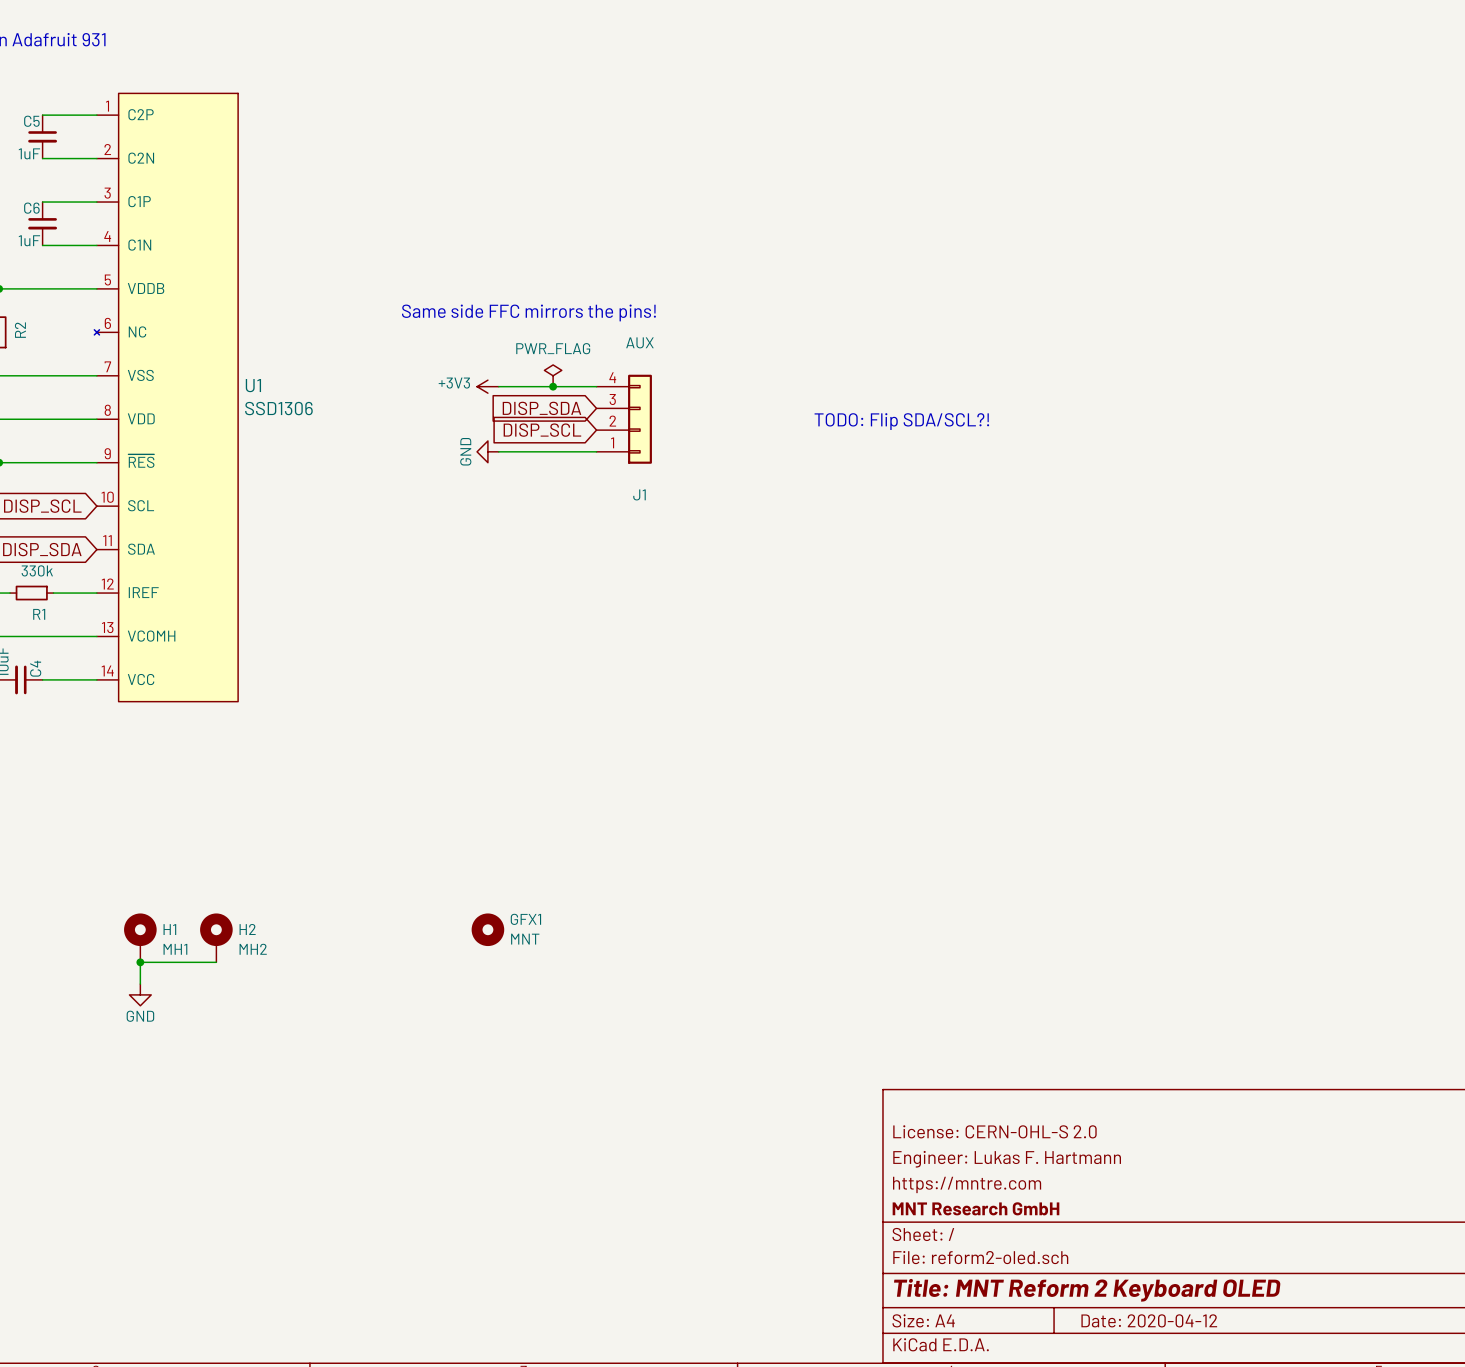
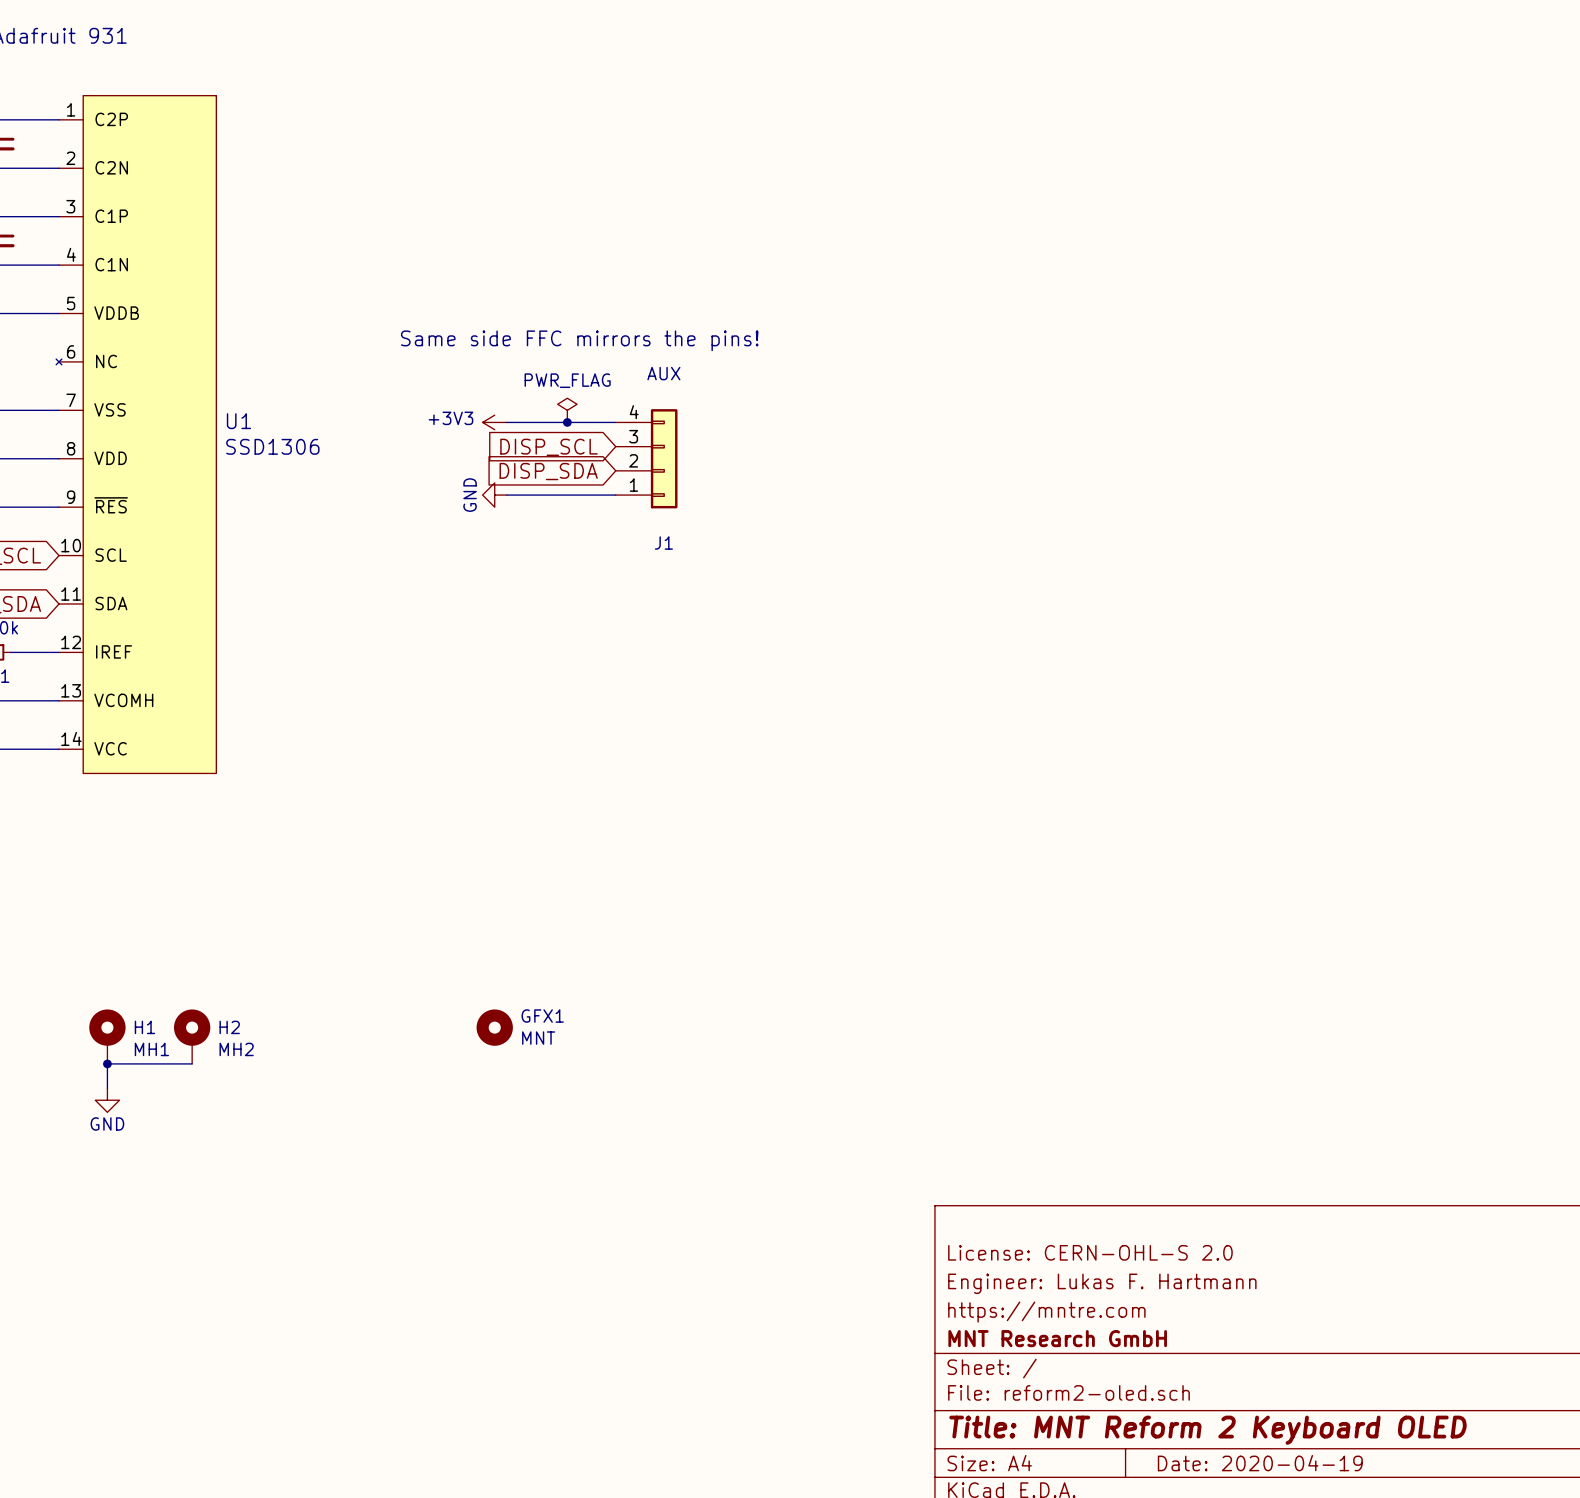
global label: DISP_SDA (541, 408) -> DISP_SCL (549, 447)
text: TODO: Flip SDA/SCL?! (901, 421) -> none
global label: DISP_SCL (542, 430) -> DISP_SDA (548, 471)
title block: Date: 2020-04-12 (1149, 1320) -> Date: 2020-04-19 (1260, 1463)

